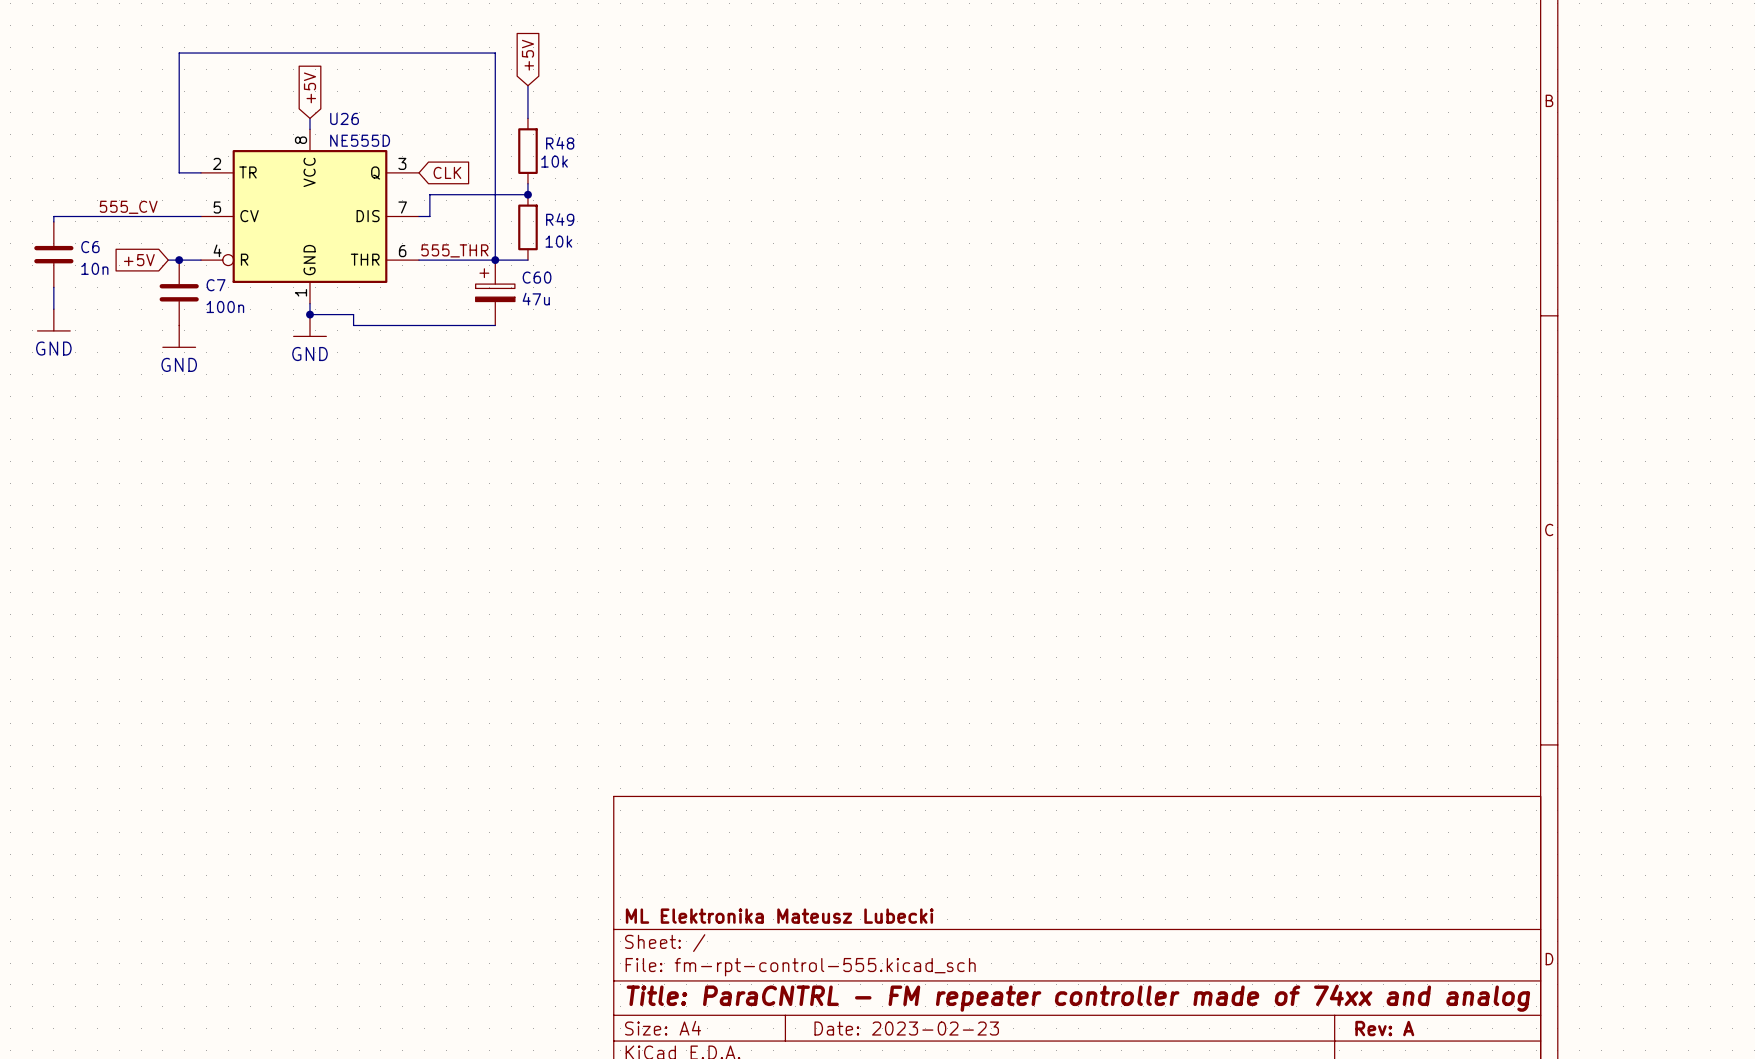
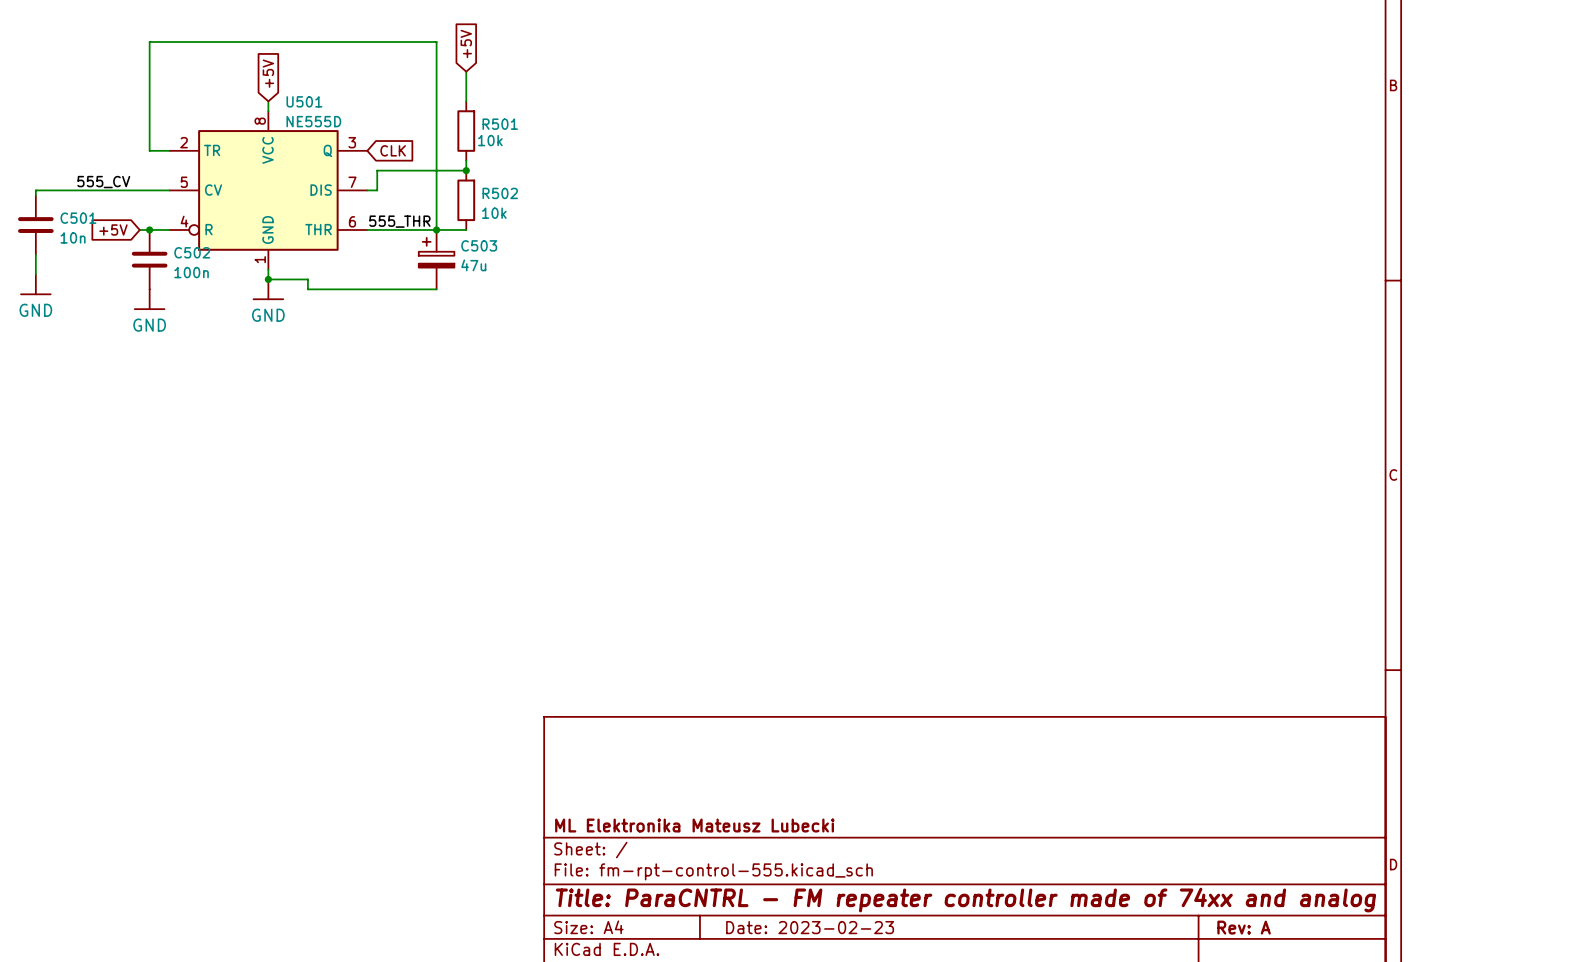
U26 name: U26 (344, 118) -> U501 (304, 101)
R48 name: R48 (560, 143) -> R501 (500, 124)
R49 name: R49 (560, 219) -> R502 (500, 193)
C6 name: C6 (90, 247) -> C501 (78, 218)
C60 name: C60 (537, 277) -> C503 (479, 245)
C7 name: C7 (216, 285) -> C502 (192, 252)

